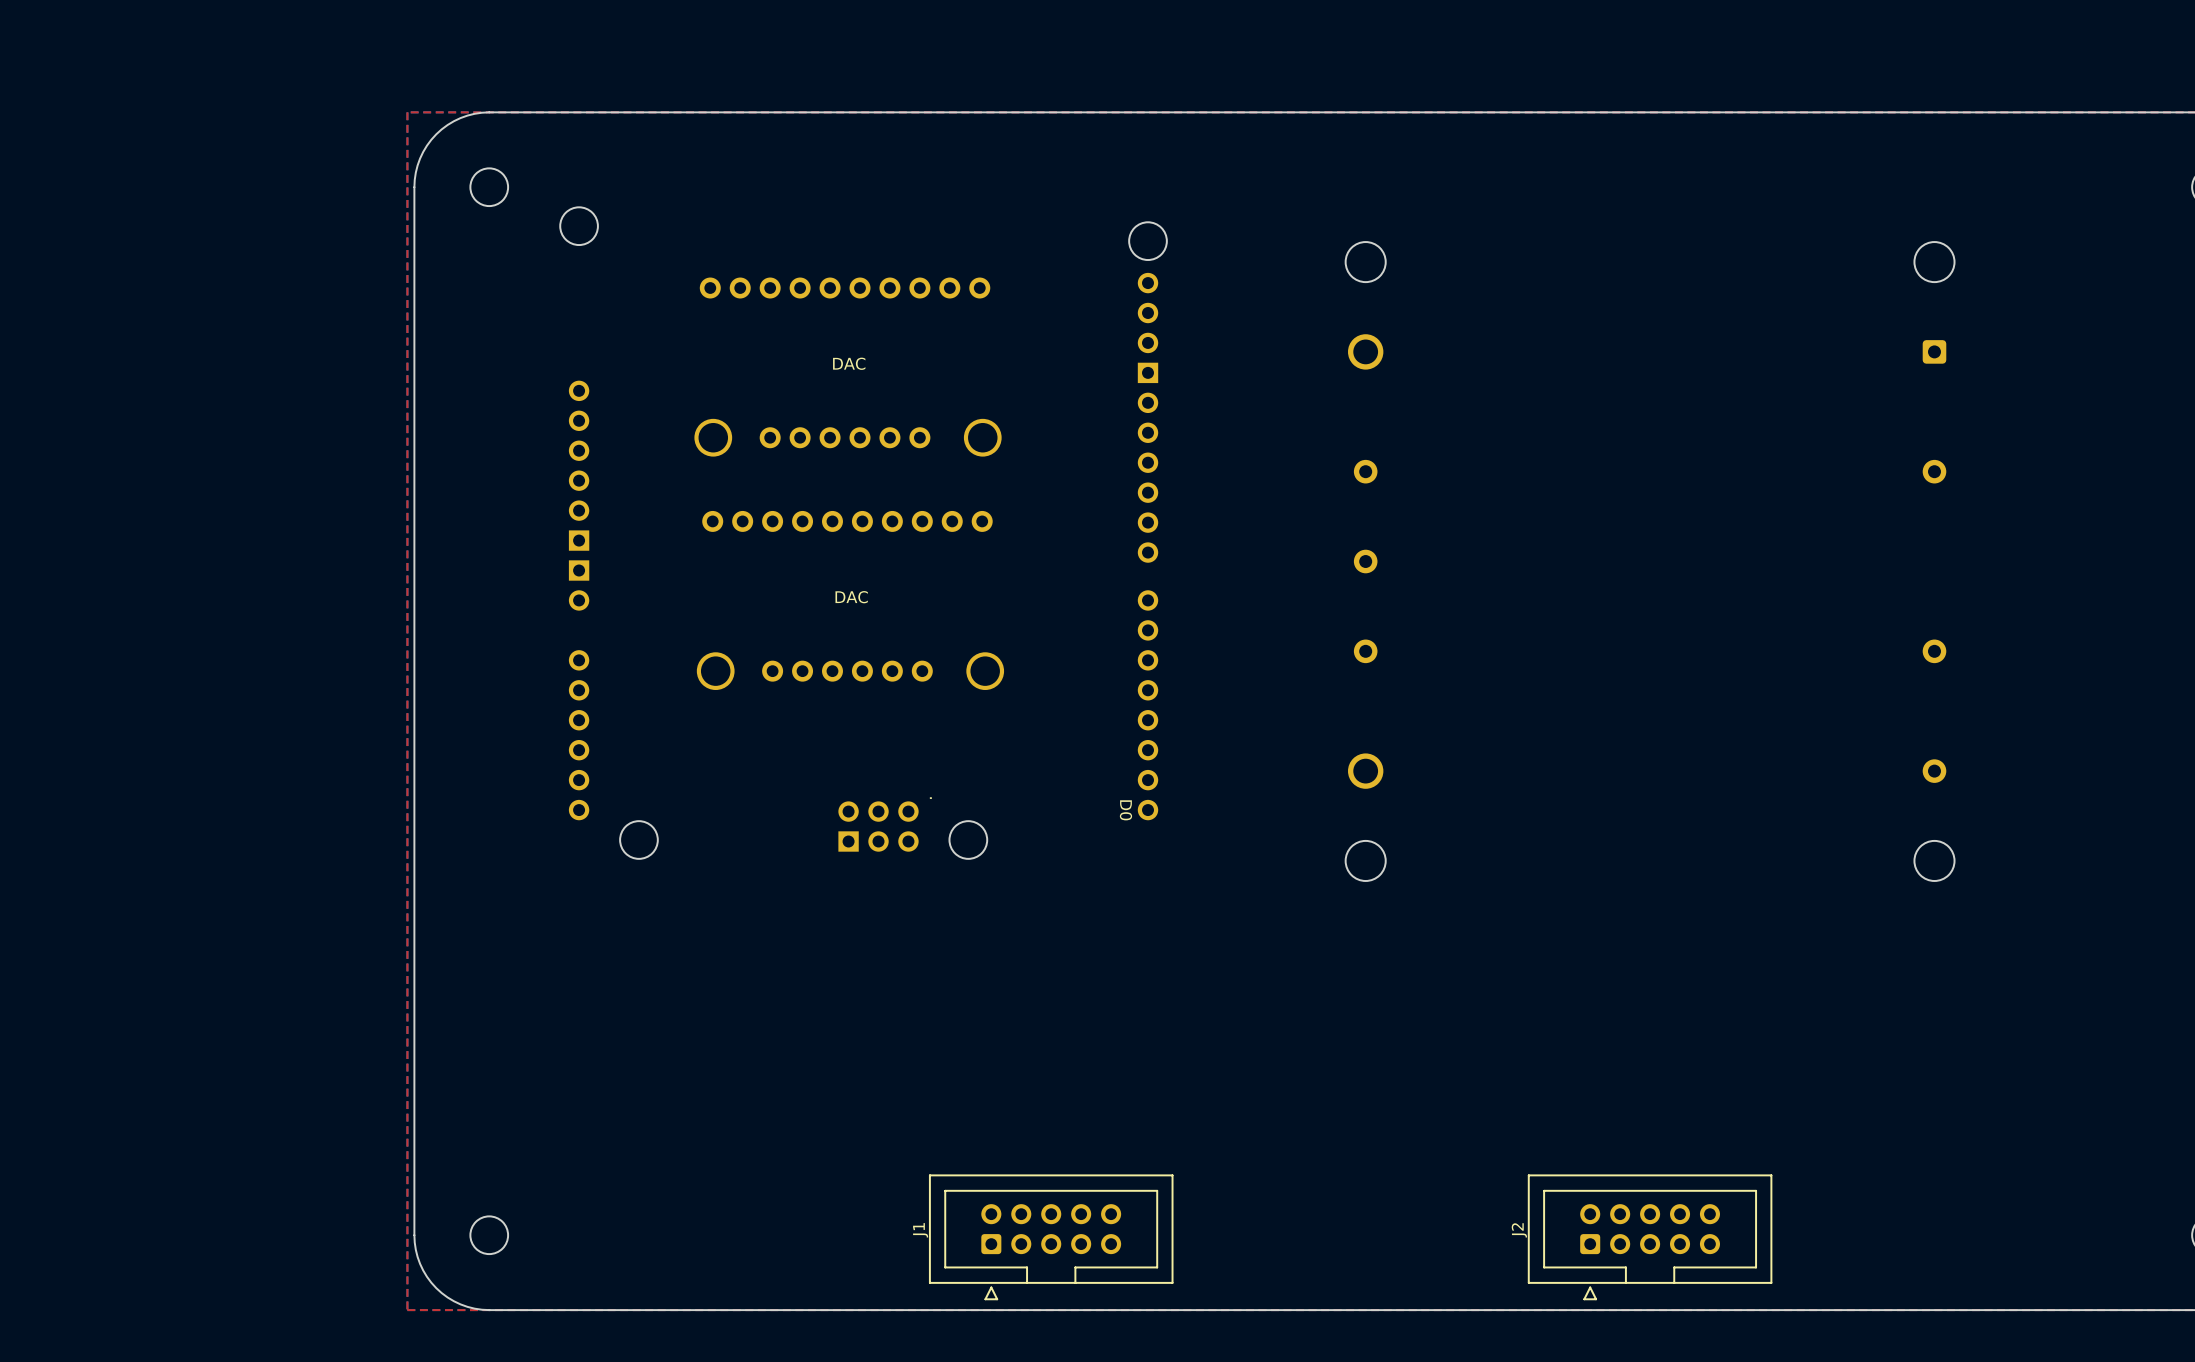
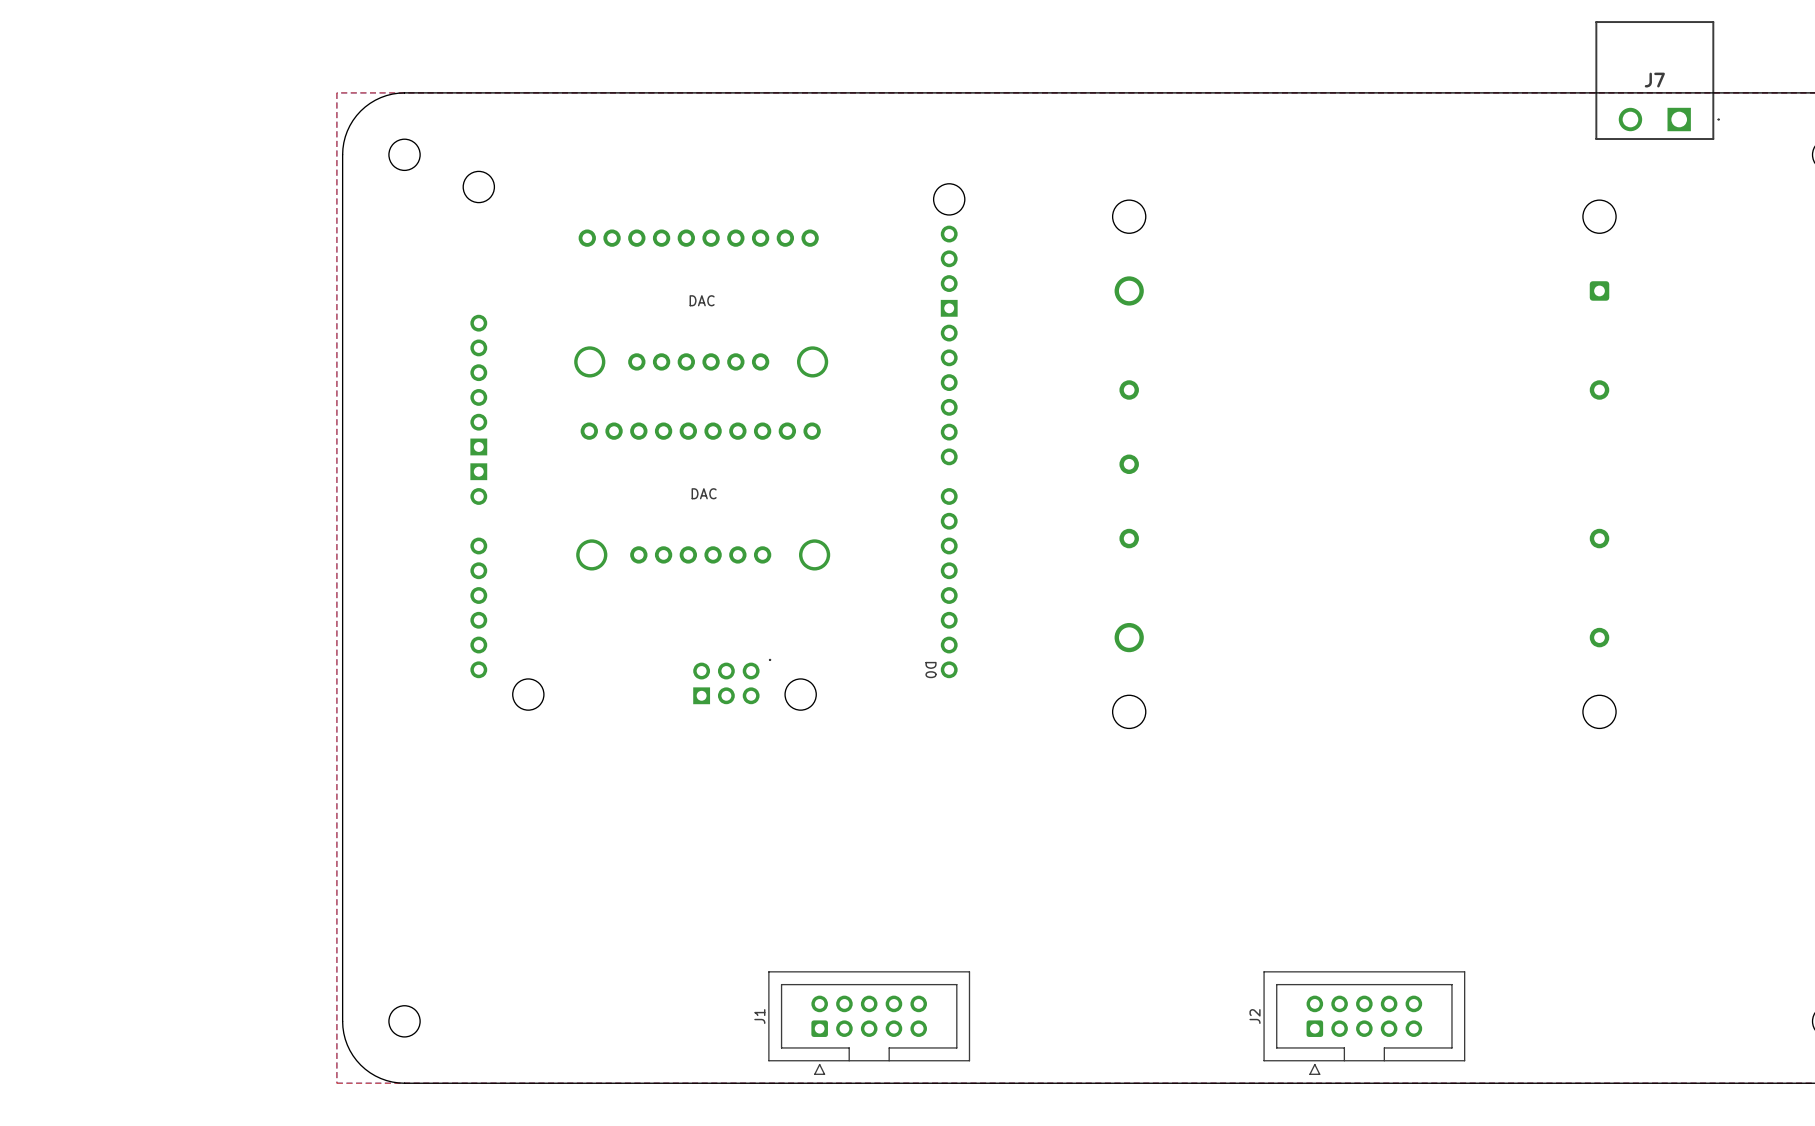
J7: none -> (1657, 80)

